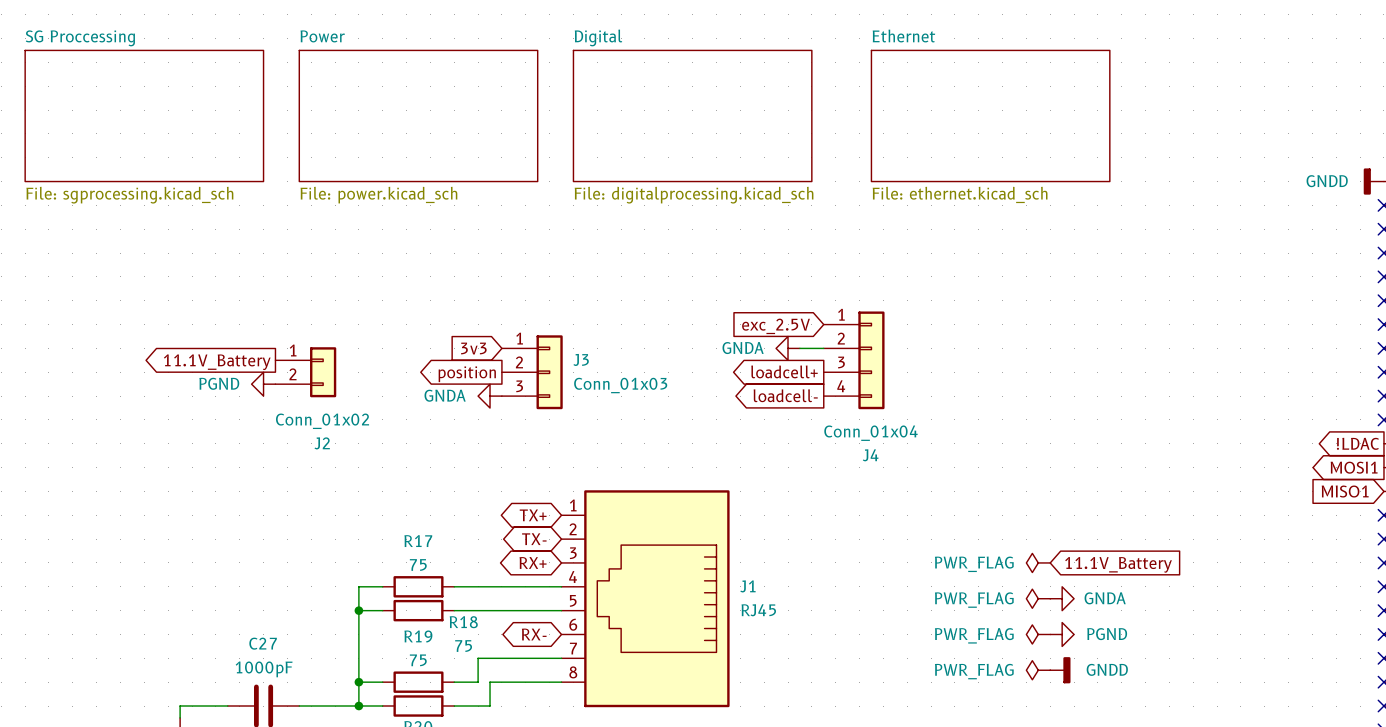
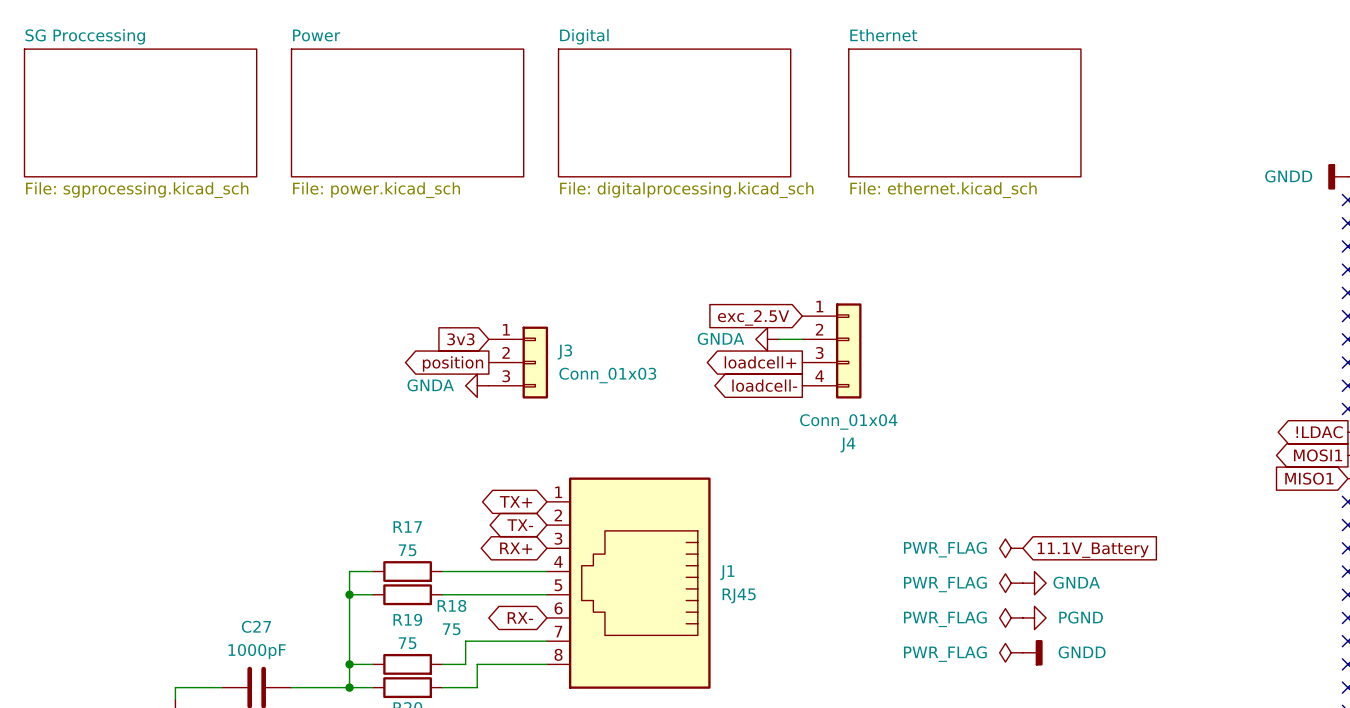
global label: 11.1V_Battery (217, 362) -> none
J2: Conn_01x02 (305, 372) -> none
power symbol: PGND (263, 384) -> none

